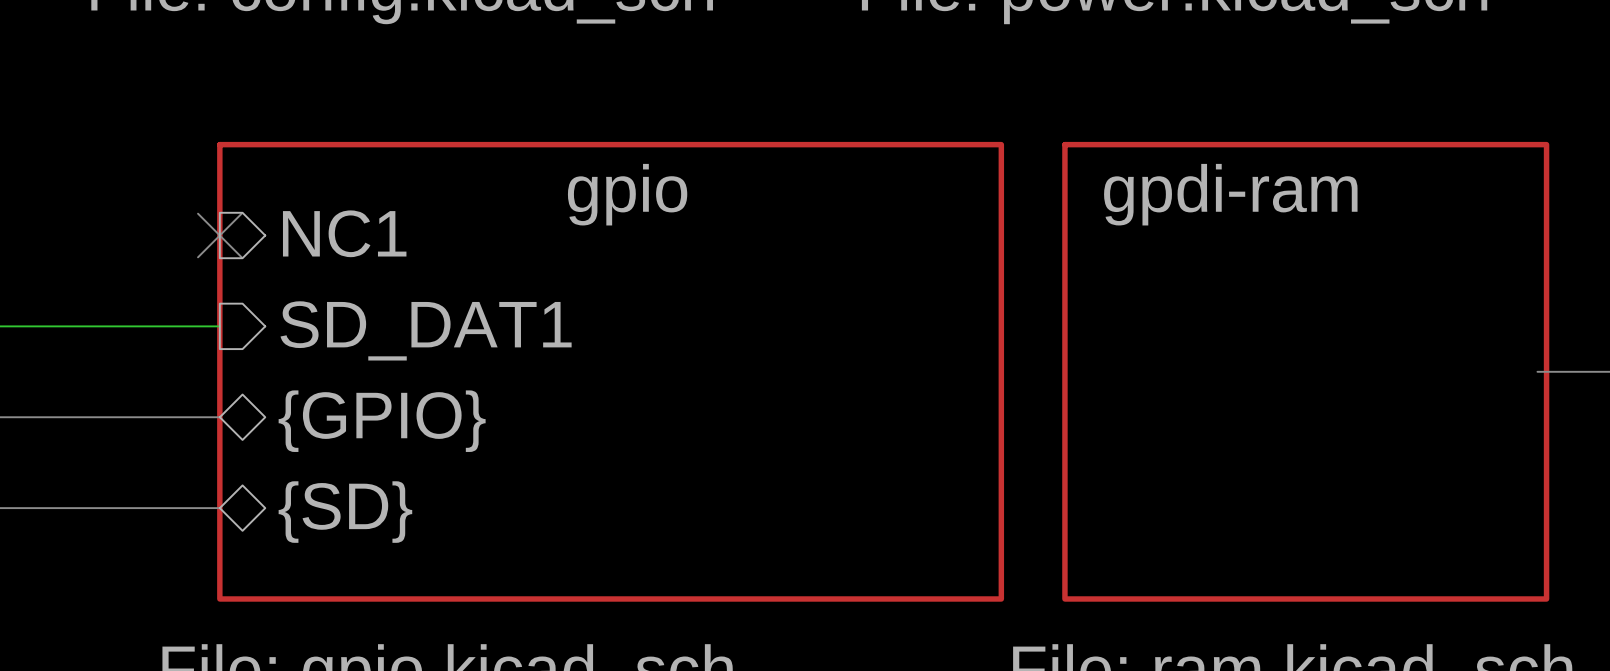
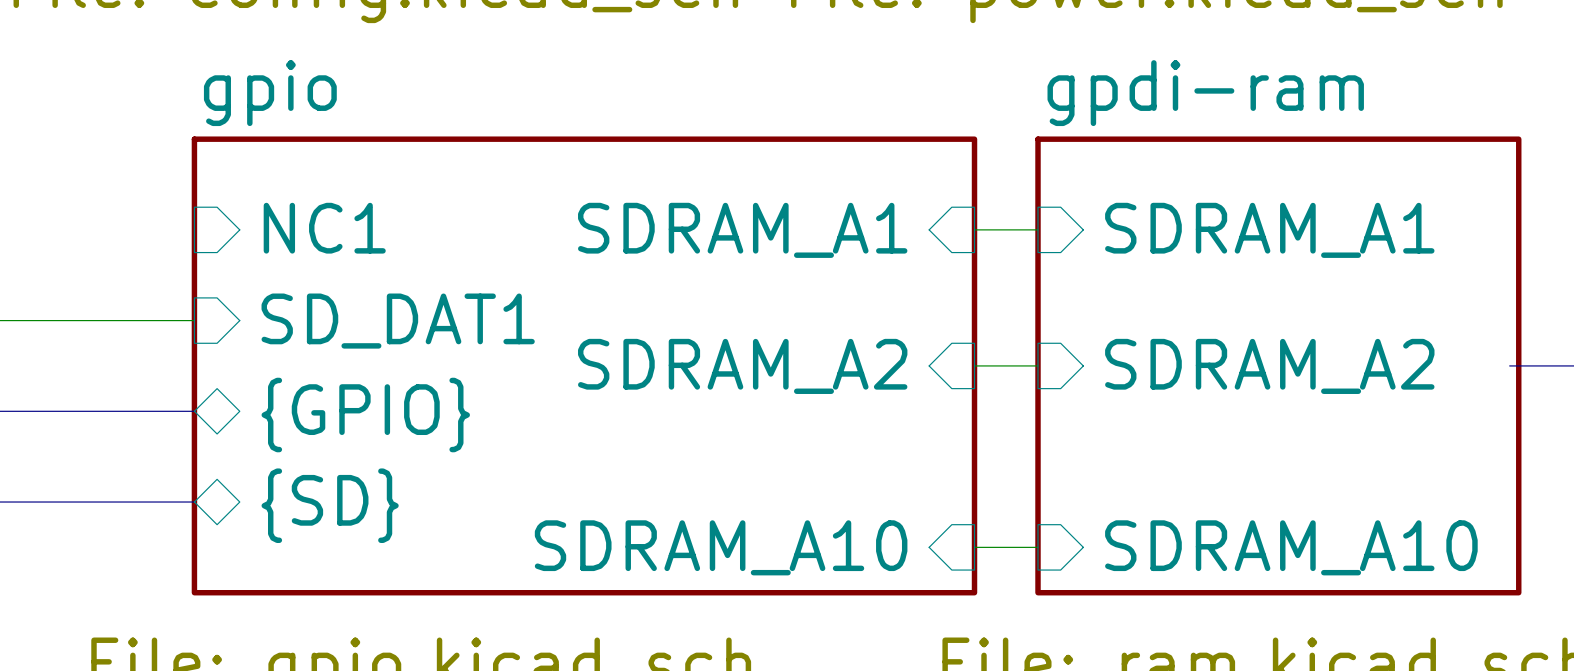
sheet gpio name position: gpio (627, 194) -> gpio (270, 93)
sheet gpdi-ram name position: gpdi-ram (1230, 194) -> gpdi-ram (1205, 93)
no-connect mark: (219, 235) -> none
wire: none -> (974, 229) (1038, 229)
sheet pin: none -> SDRAM_A1 (742, 230)
sheet pin: none -> SDRAM_A1 (1269, 230)
wire: none -> (974, 365) (1038, 365)
sheet pin: none -> SDRAM_A2 (742, 366)
sheet pin: none -> SDRAM_A2 (1269, 366)
wire: none -> (974, 547) (1038, 547)
sheet pin: none -> SDRAM_A10 (721, 547)
sheet pin: none -> SDRAM_A10 (1291, 547)

